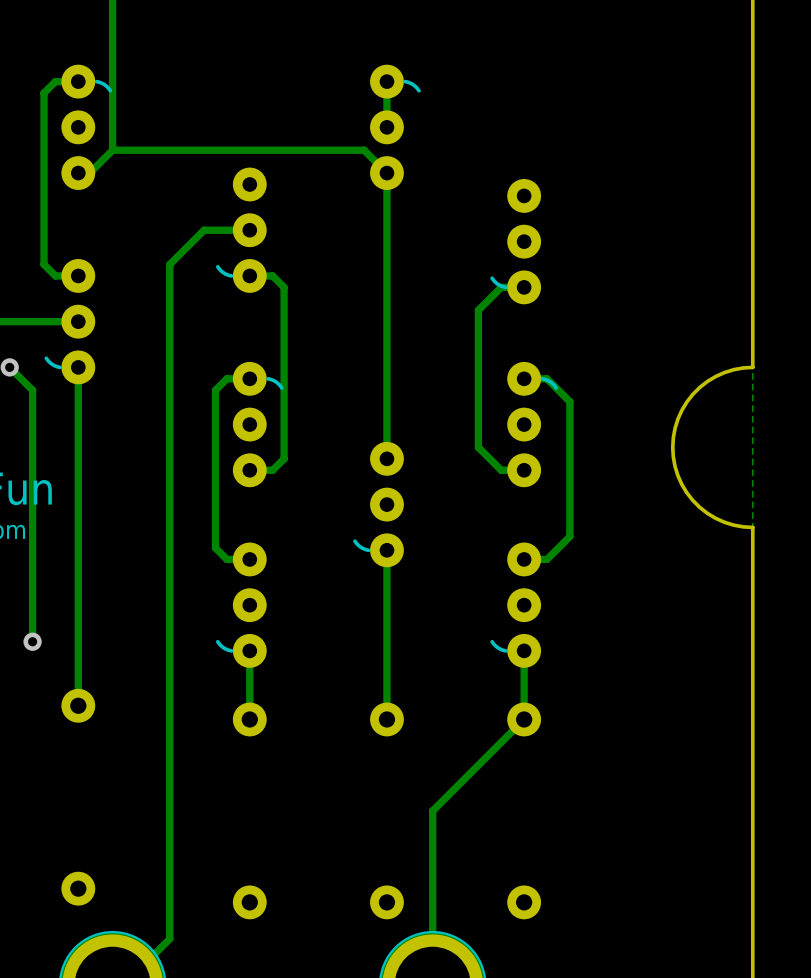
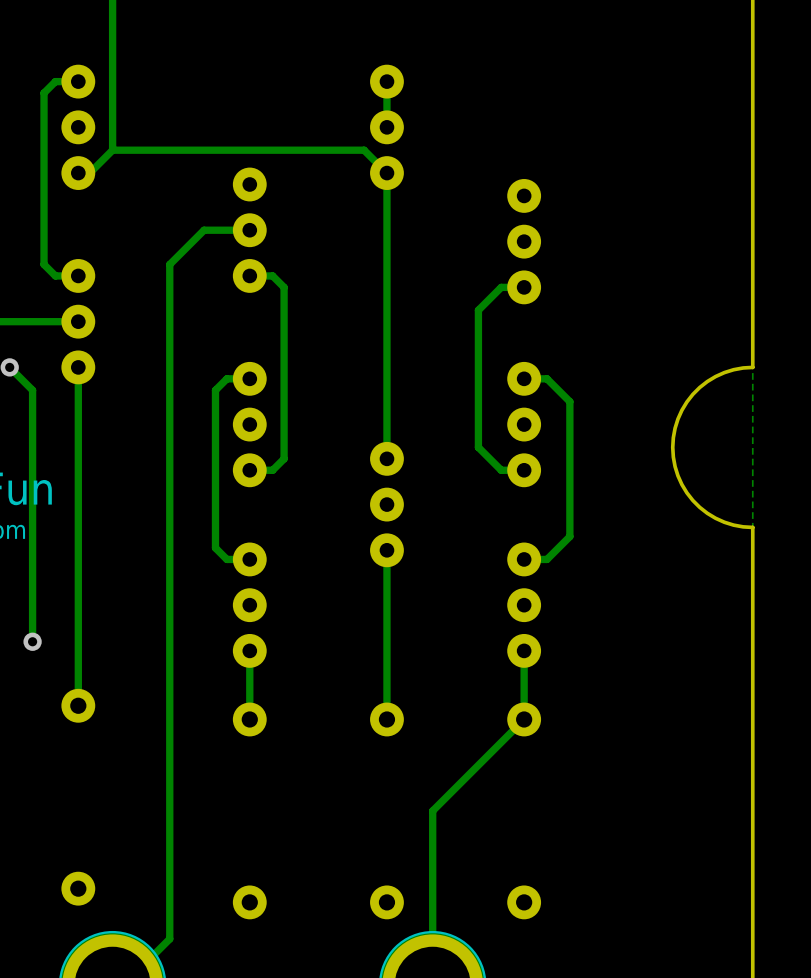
part footprint: [61, 64, 113, 190] -> [61, 64, 96, 190]
part footprint: [370, 64, 421, 190] -> [370, 64, 404, 190]
part footprint: [215, 167, 267, 293] -> [232, 167, 267, 293]
part footprint: [490, 179, 542, 305] -> [507, 179, 542, 305]
part footprint: [44, 259, 96, 385] -> [61, 259, 96, 385]
part footprint: [232, 361, 284, 488] -> [232, 361, 267, 488]
part footprint: [507, 361, 558, 488] -> [507, 361, 542, 488]
part footprint: [353, 441, 404, 568] -> [370, 441, 404, 568]
part footprint: [215, 542, 267, 668] -> [232, 542, 267, 668]
part footprint: [490, 542, 542, 668] -> [507, 542, 542, 668]

